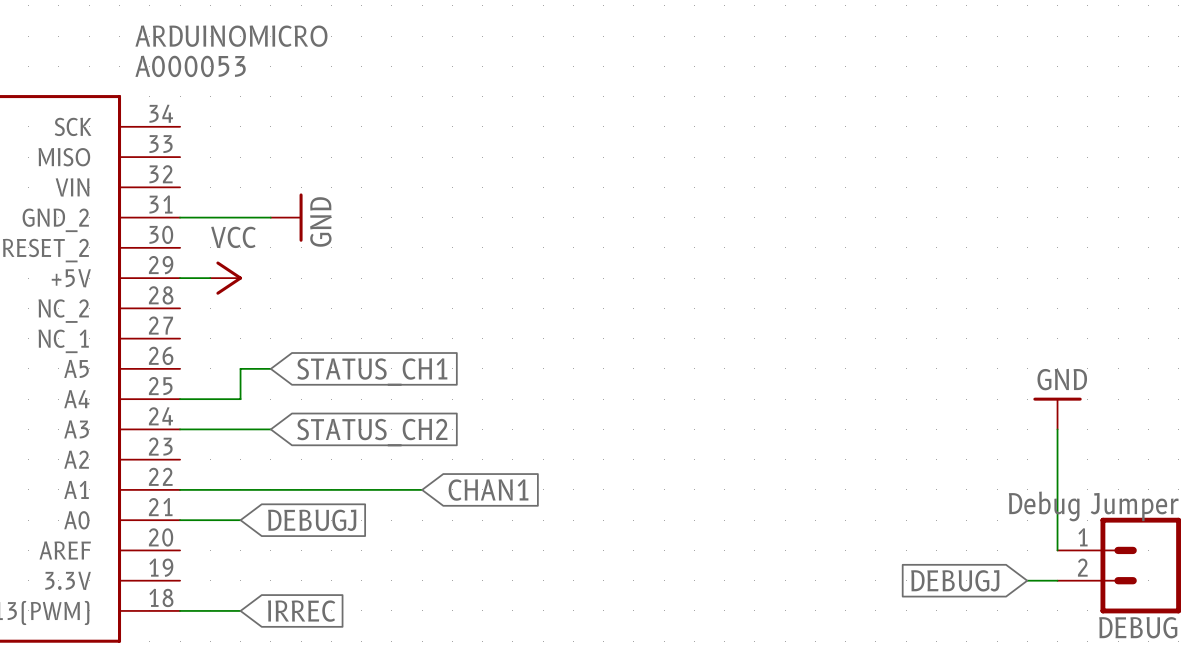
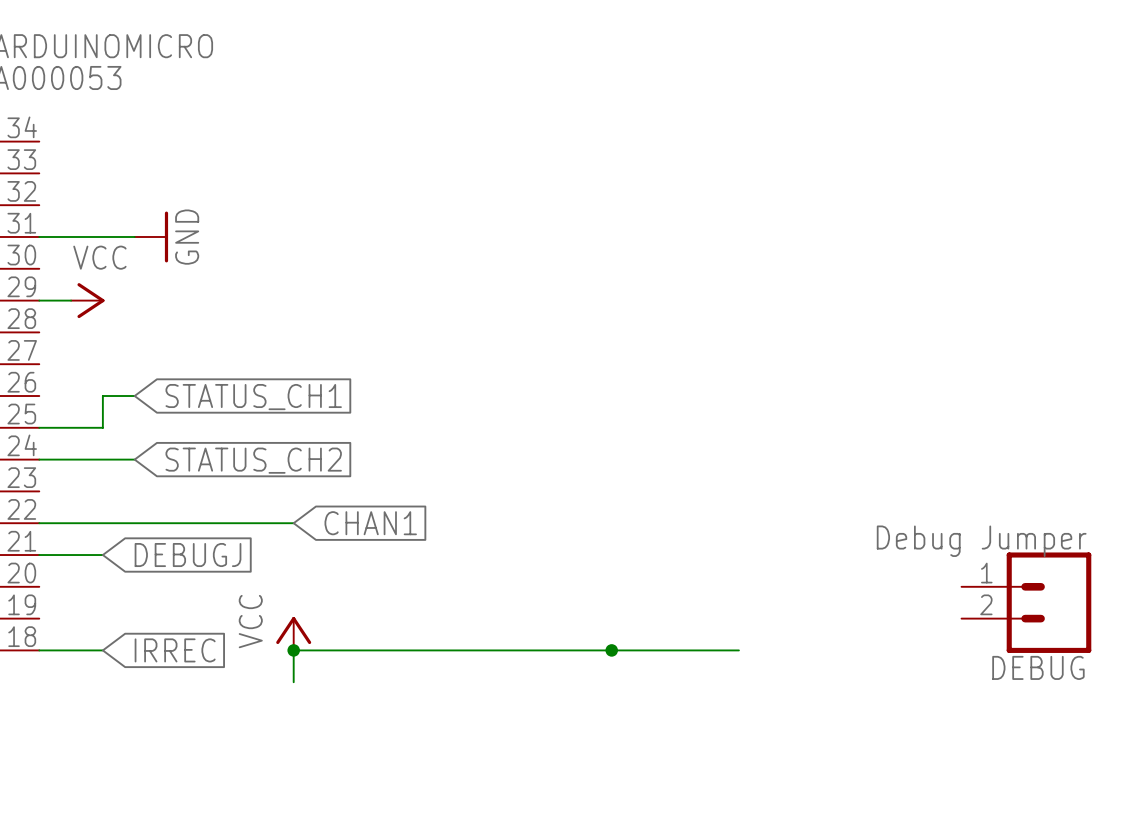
power symbol: GND (1057, 413) -> none
wire: (1057, 429) (1057, 550) -> none
global label: DEBUGJ (955, 580) -> none
wire: (1027, 580) (1057, 580) -> none
power symbol: none -> VCC (293, 633)
junction: none -> (293, 650)
junction: none -> (611, 650)
wire: none -> (738, 650) (293, 650) (293, 682)

